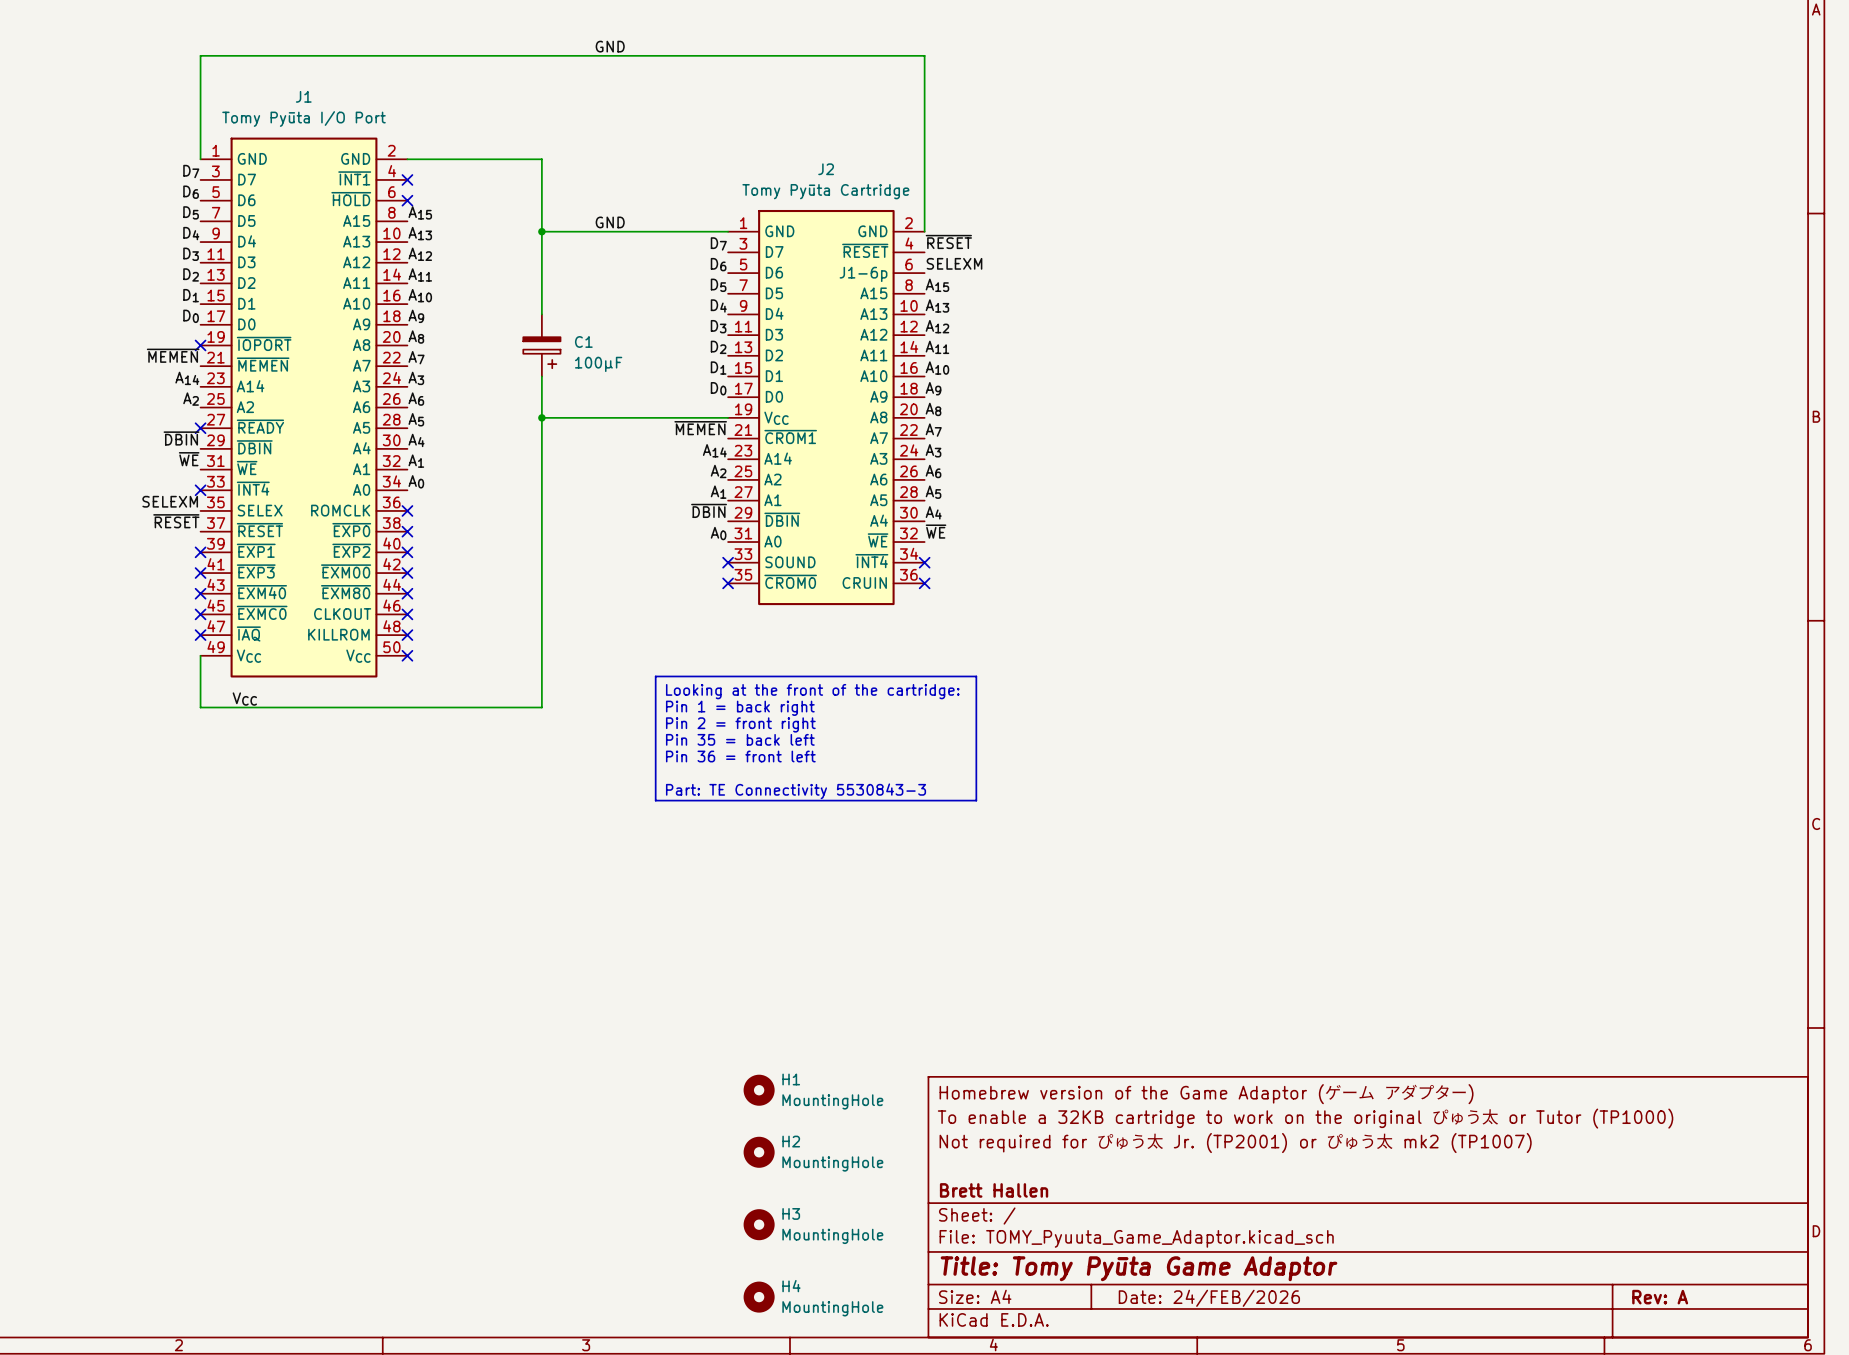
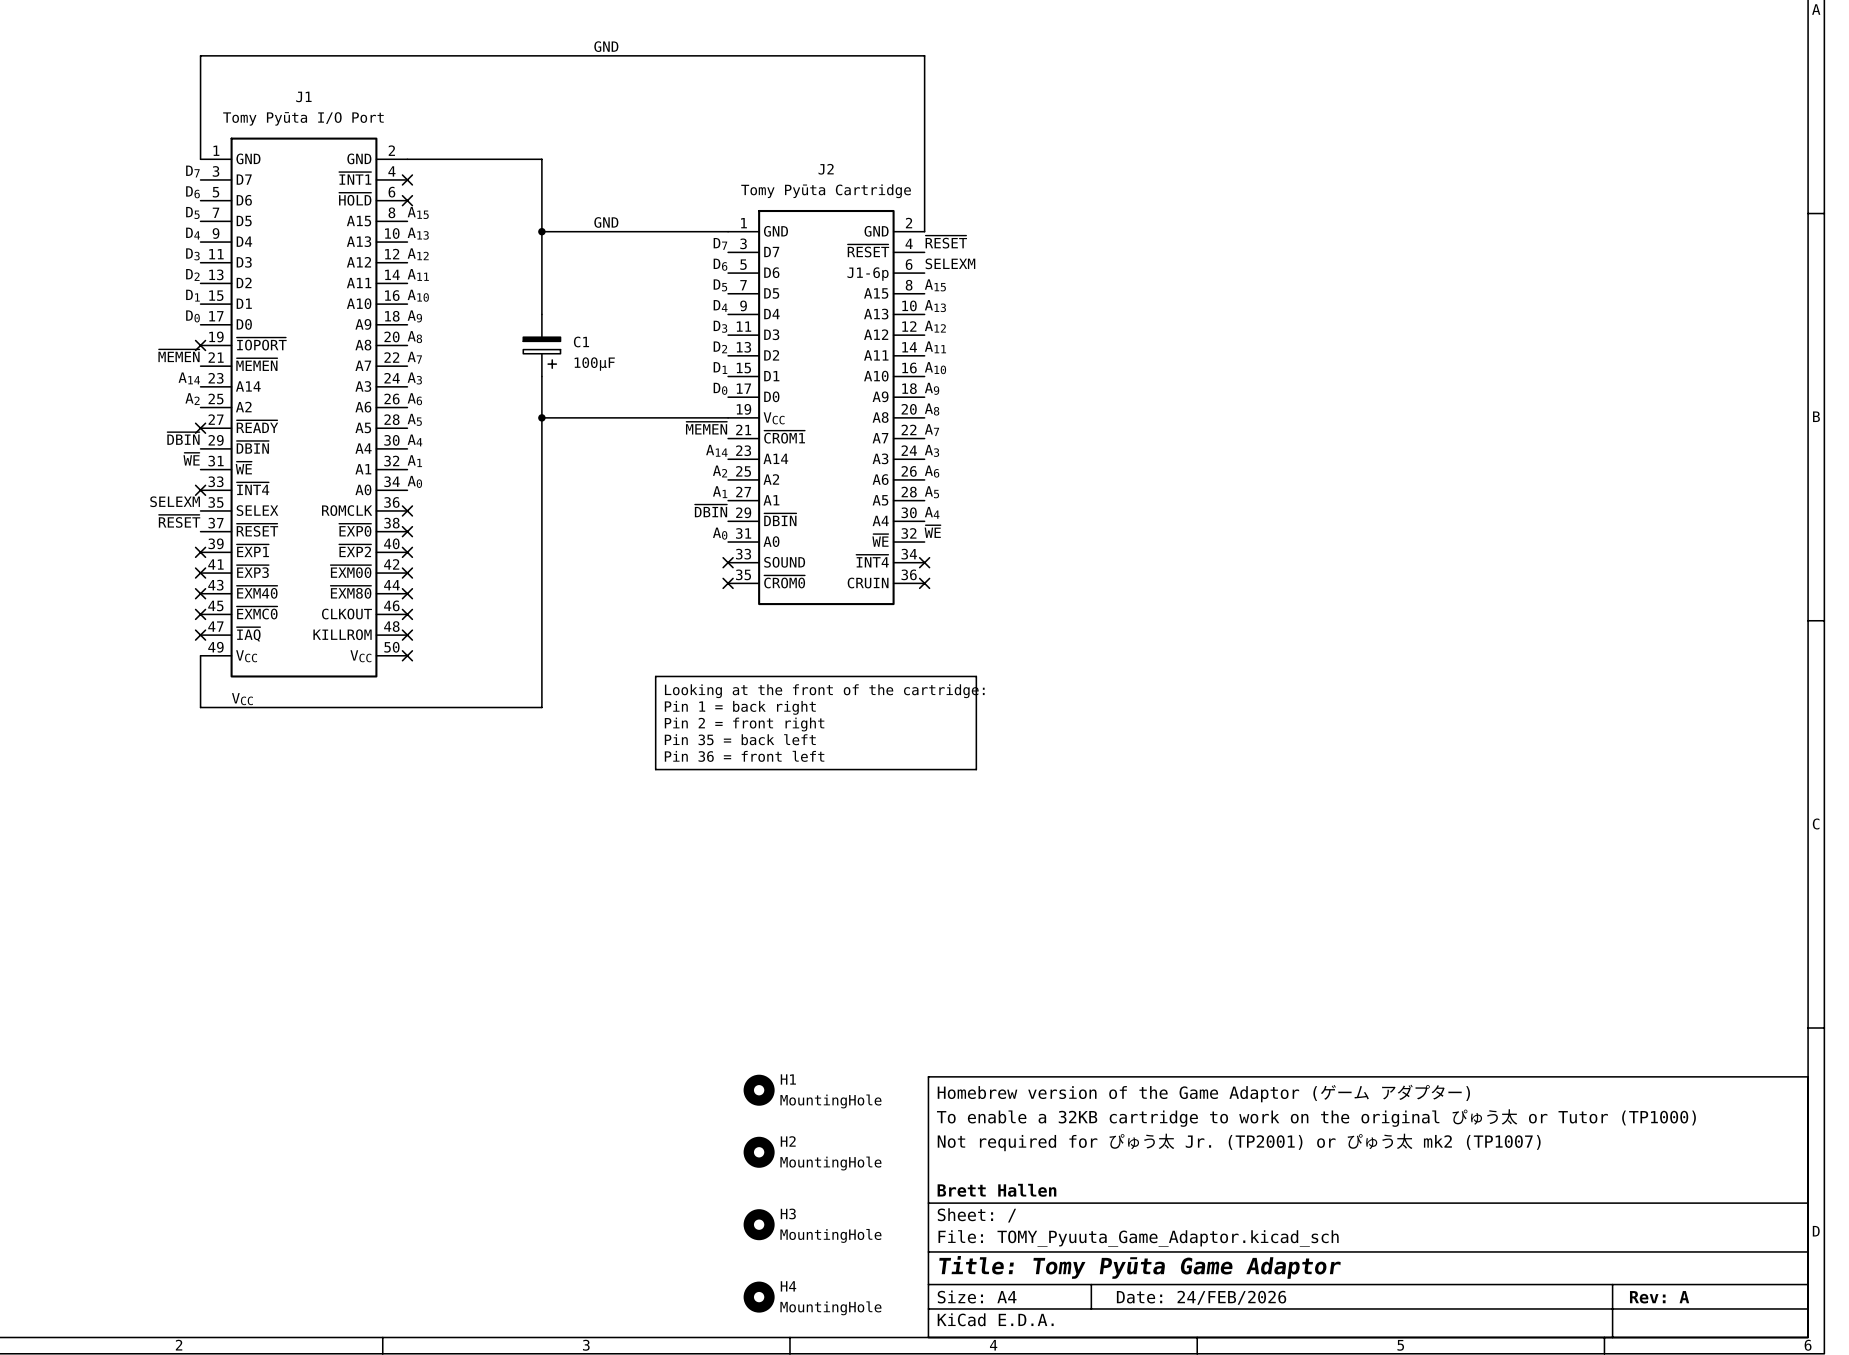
line: (655, 769) (655, 800) (976, 800) (976, 769) -> (655, 769) (976, 769)
text: Part: TE Connectivity 5530843-3 (796, 791) -> none

